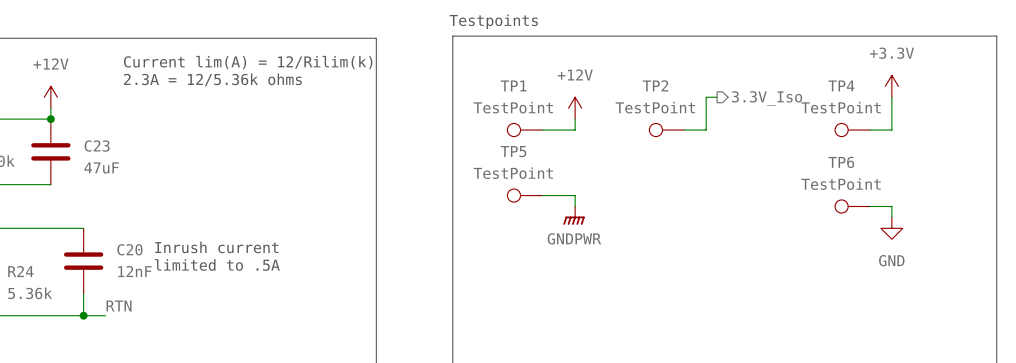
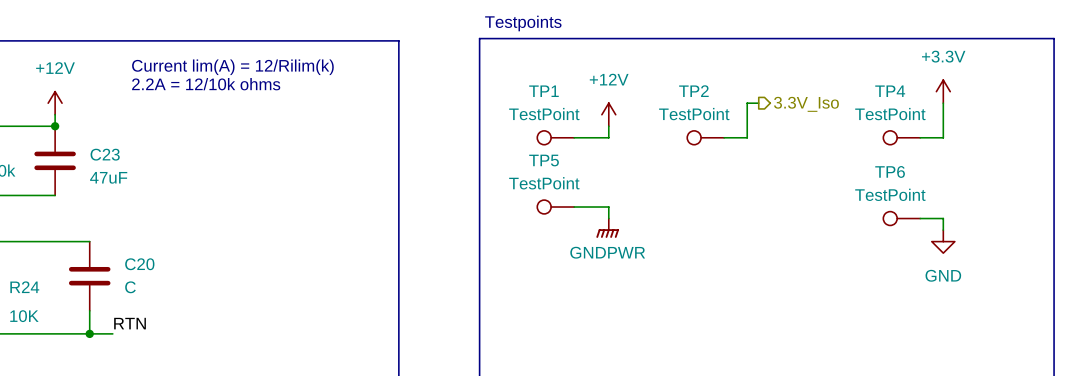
text: 2.3A = 12/5.36k ohms (212, 79) -> 2.2A = 12/10k ohms (206, 84)
text: Inrush current (216, 247) -> none
text: limited to .5A (217, 264) -> none
C20 value: 12nF (134, 271) -> C (130, 287)
R24 value: 5.36k (30, 293) -> 10K (24, 316)

